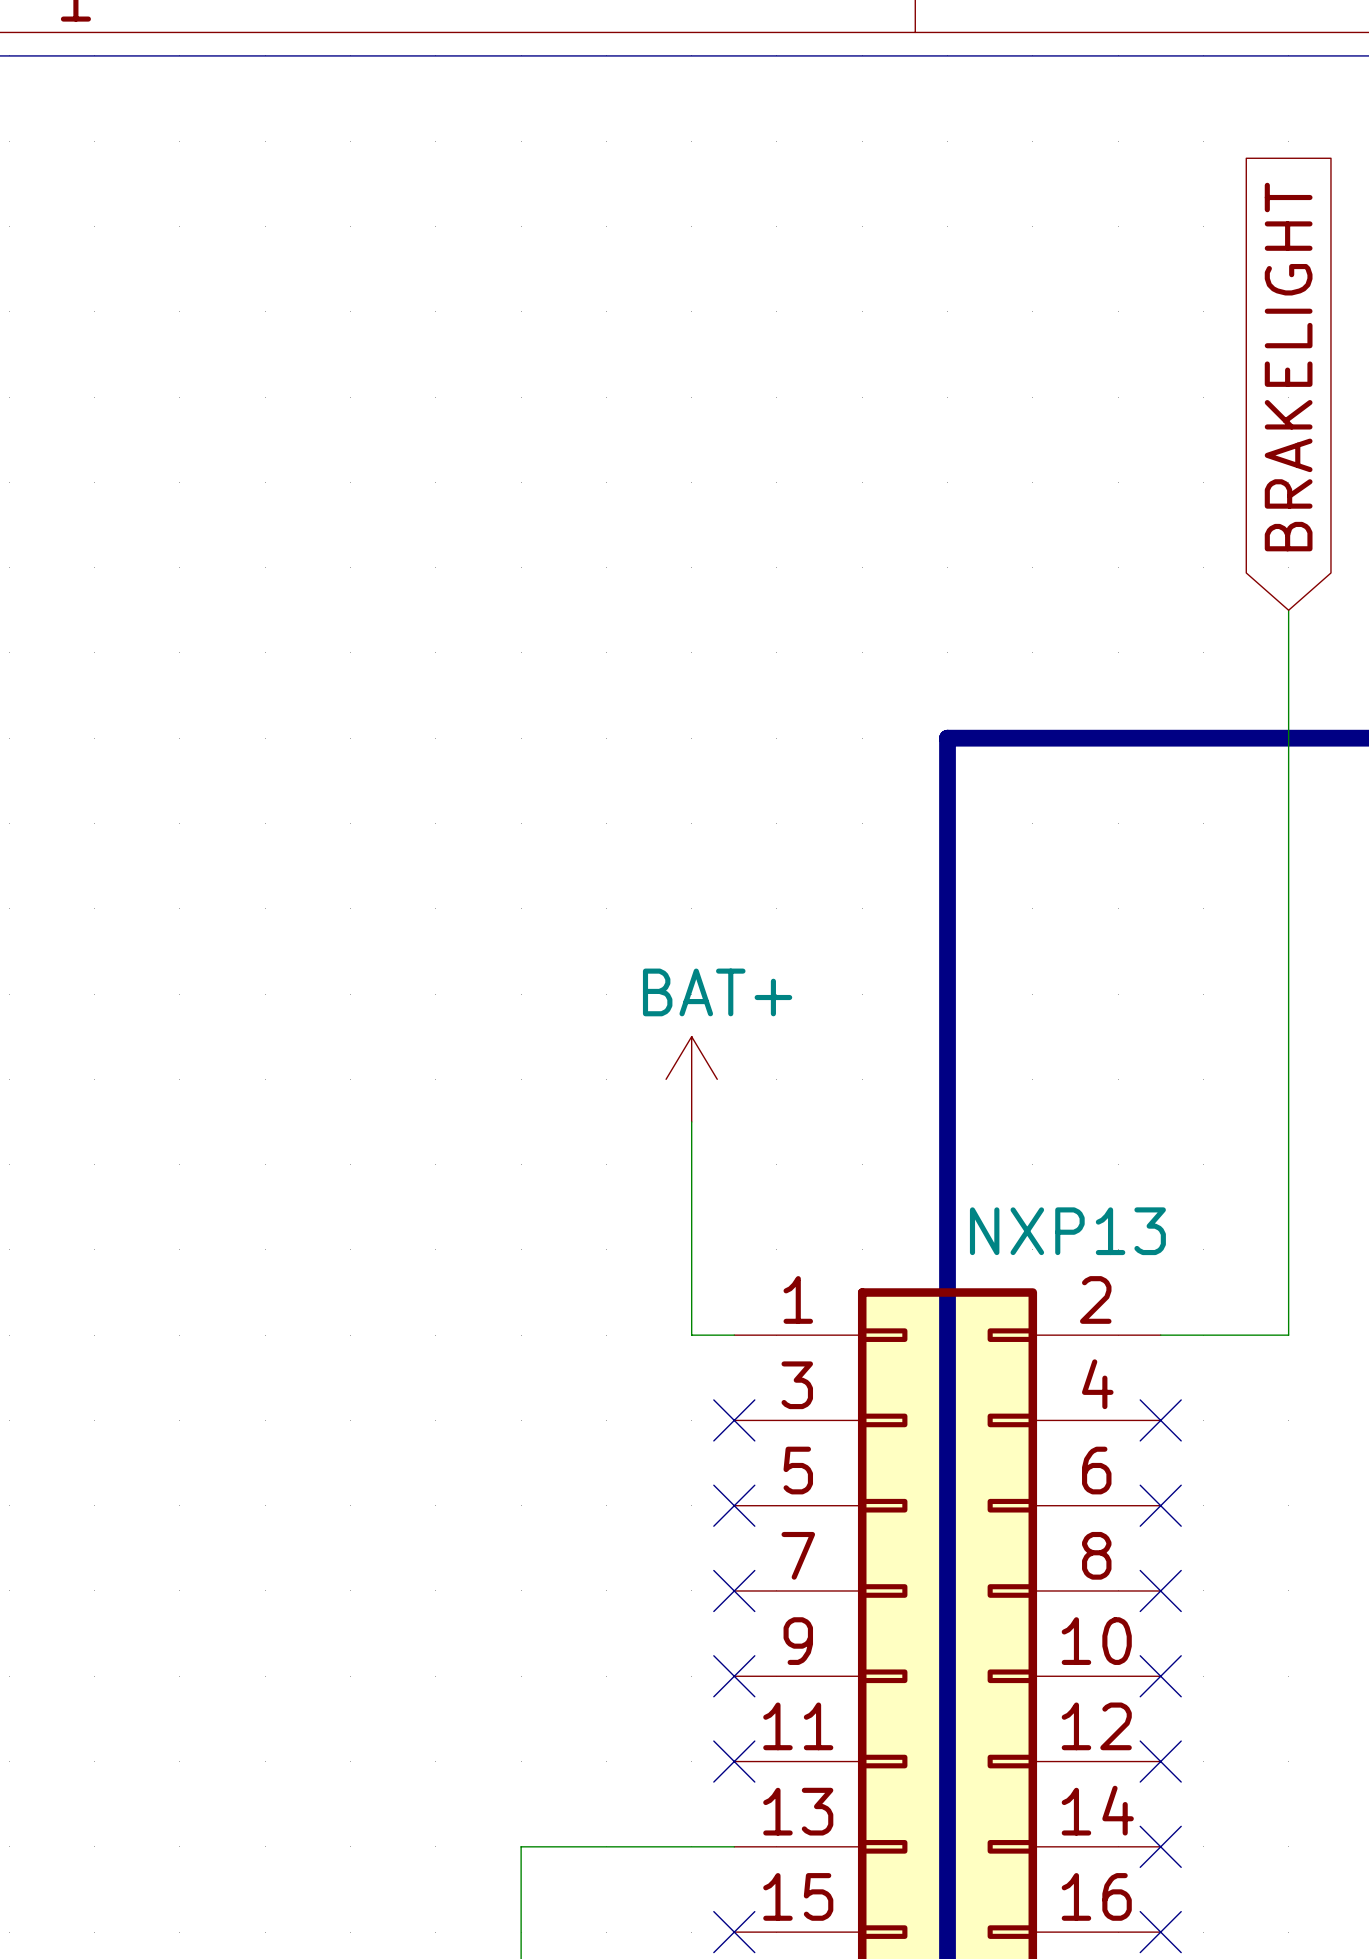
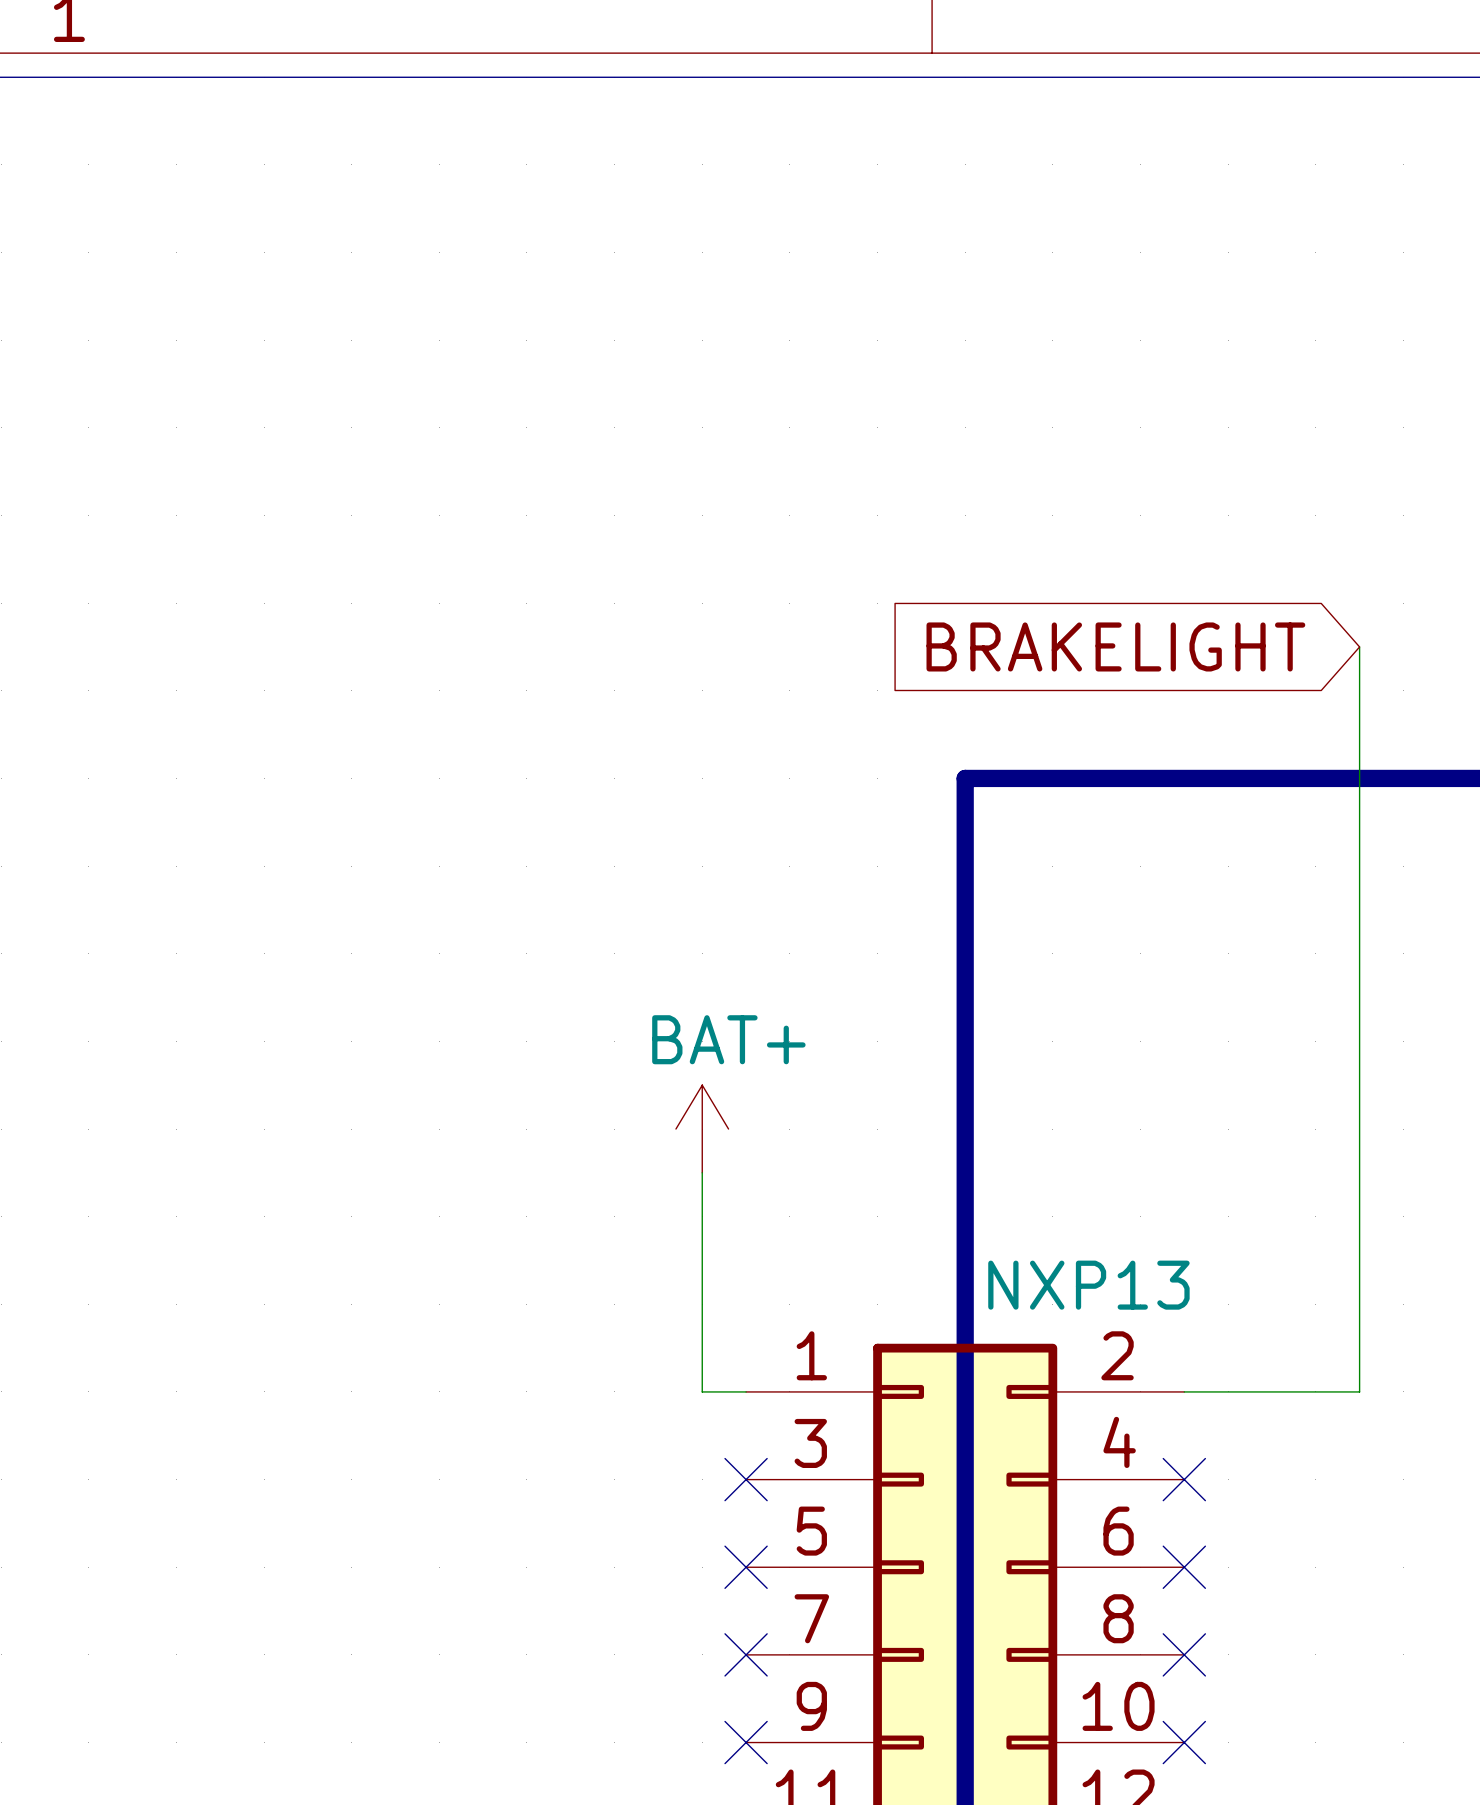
global label rotation: 0° (1288, 367) -> 90° counterclockwise (1115, 646)
wire: (1288, 610) (1288, 1335) -> (1359, 646) (1359, 1391) (1315, 1391)

